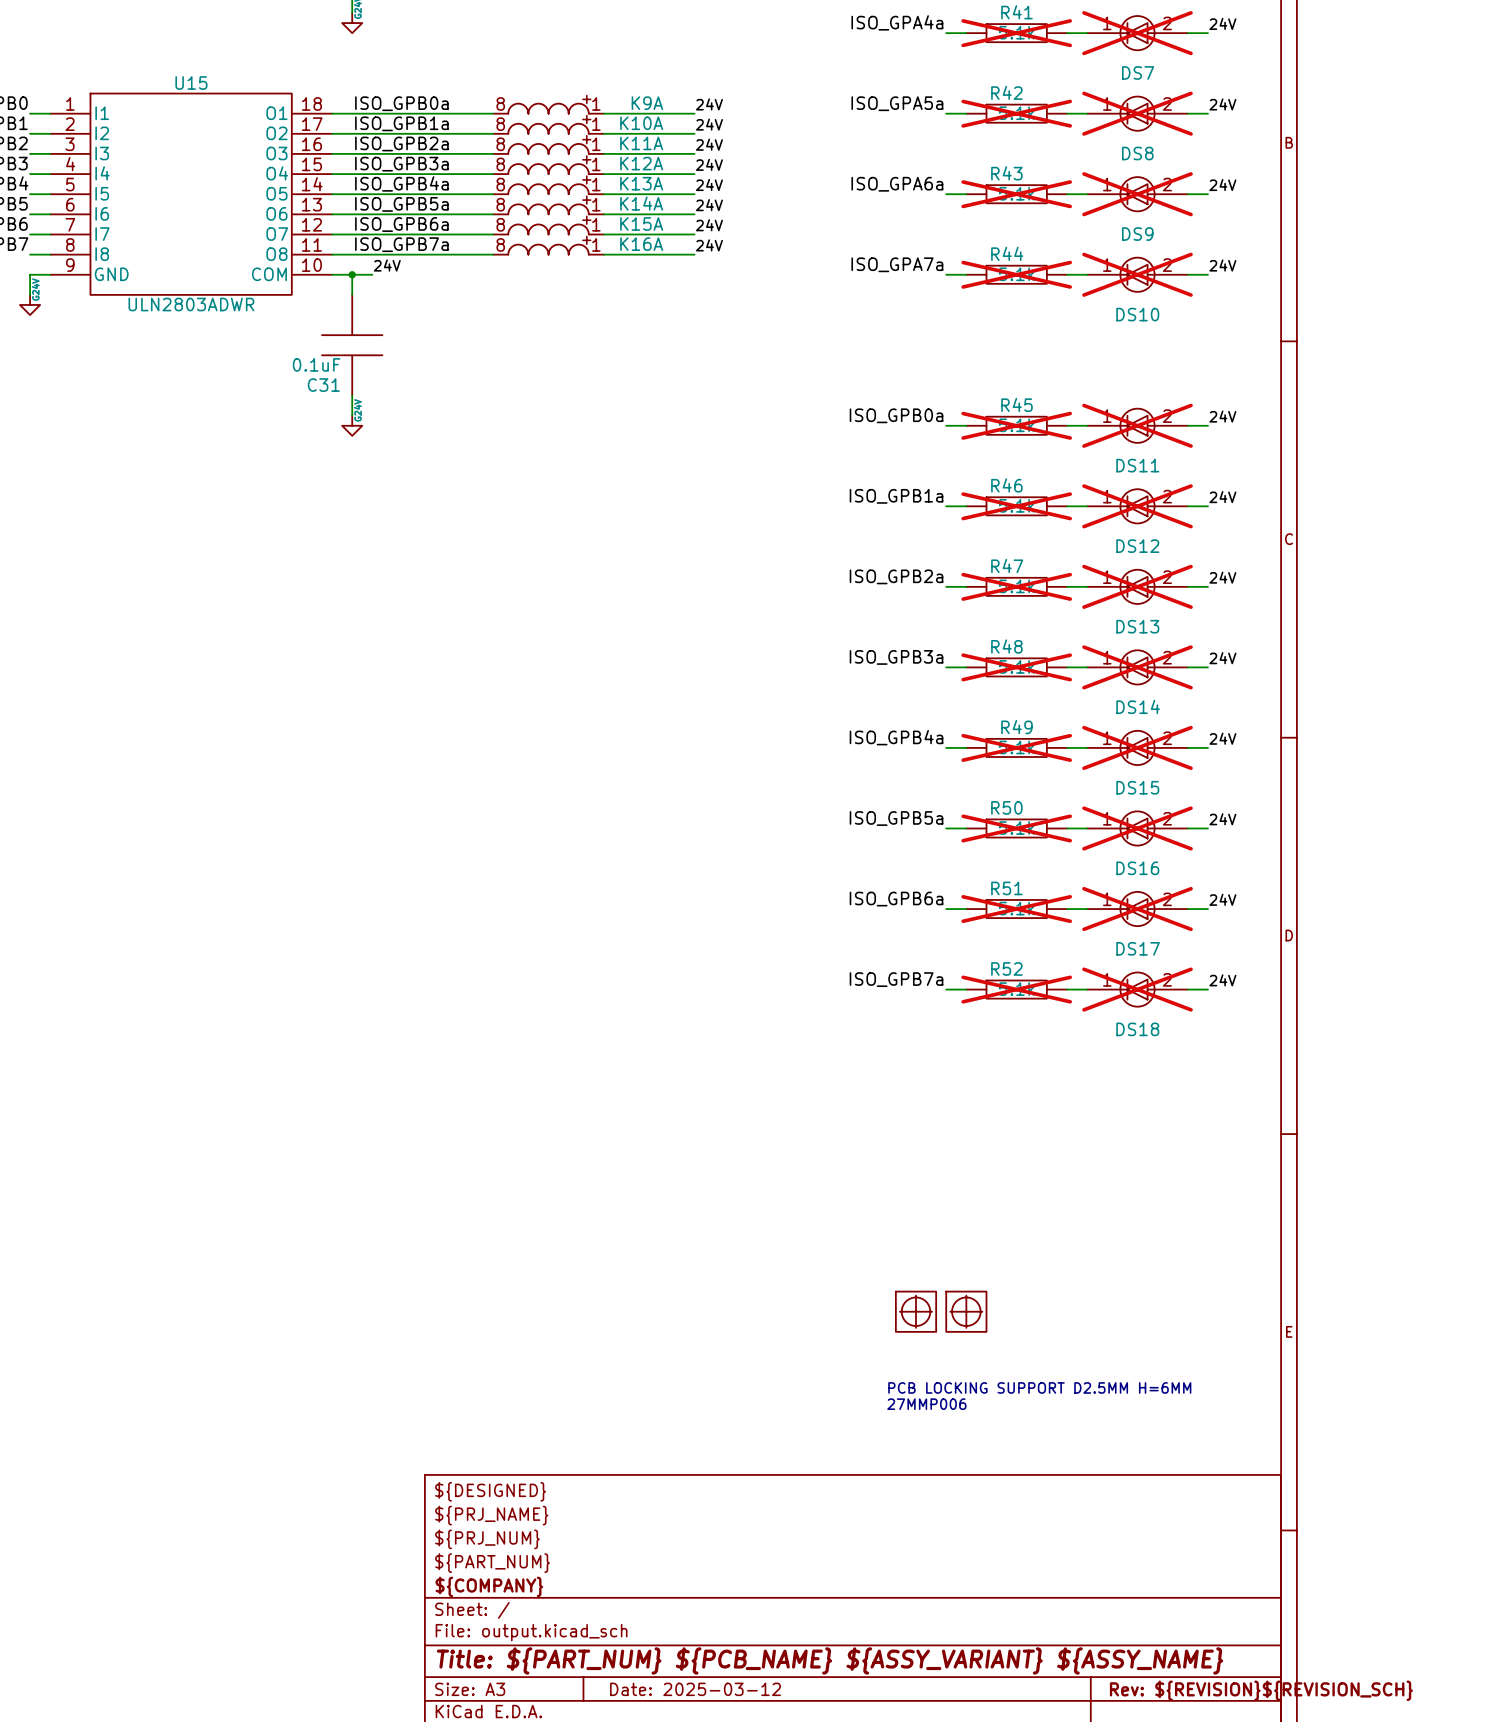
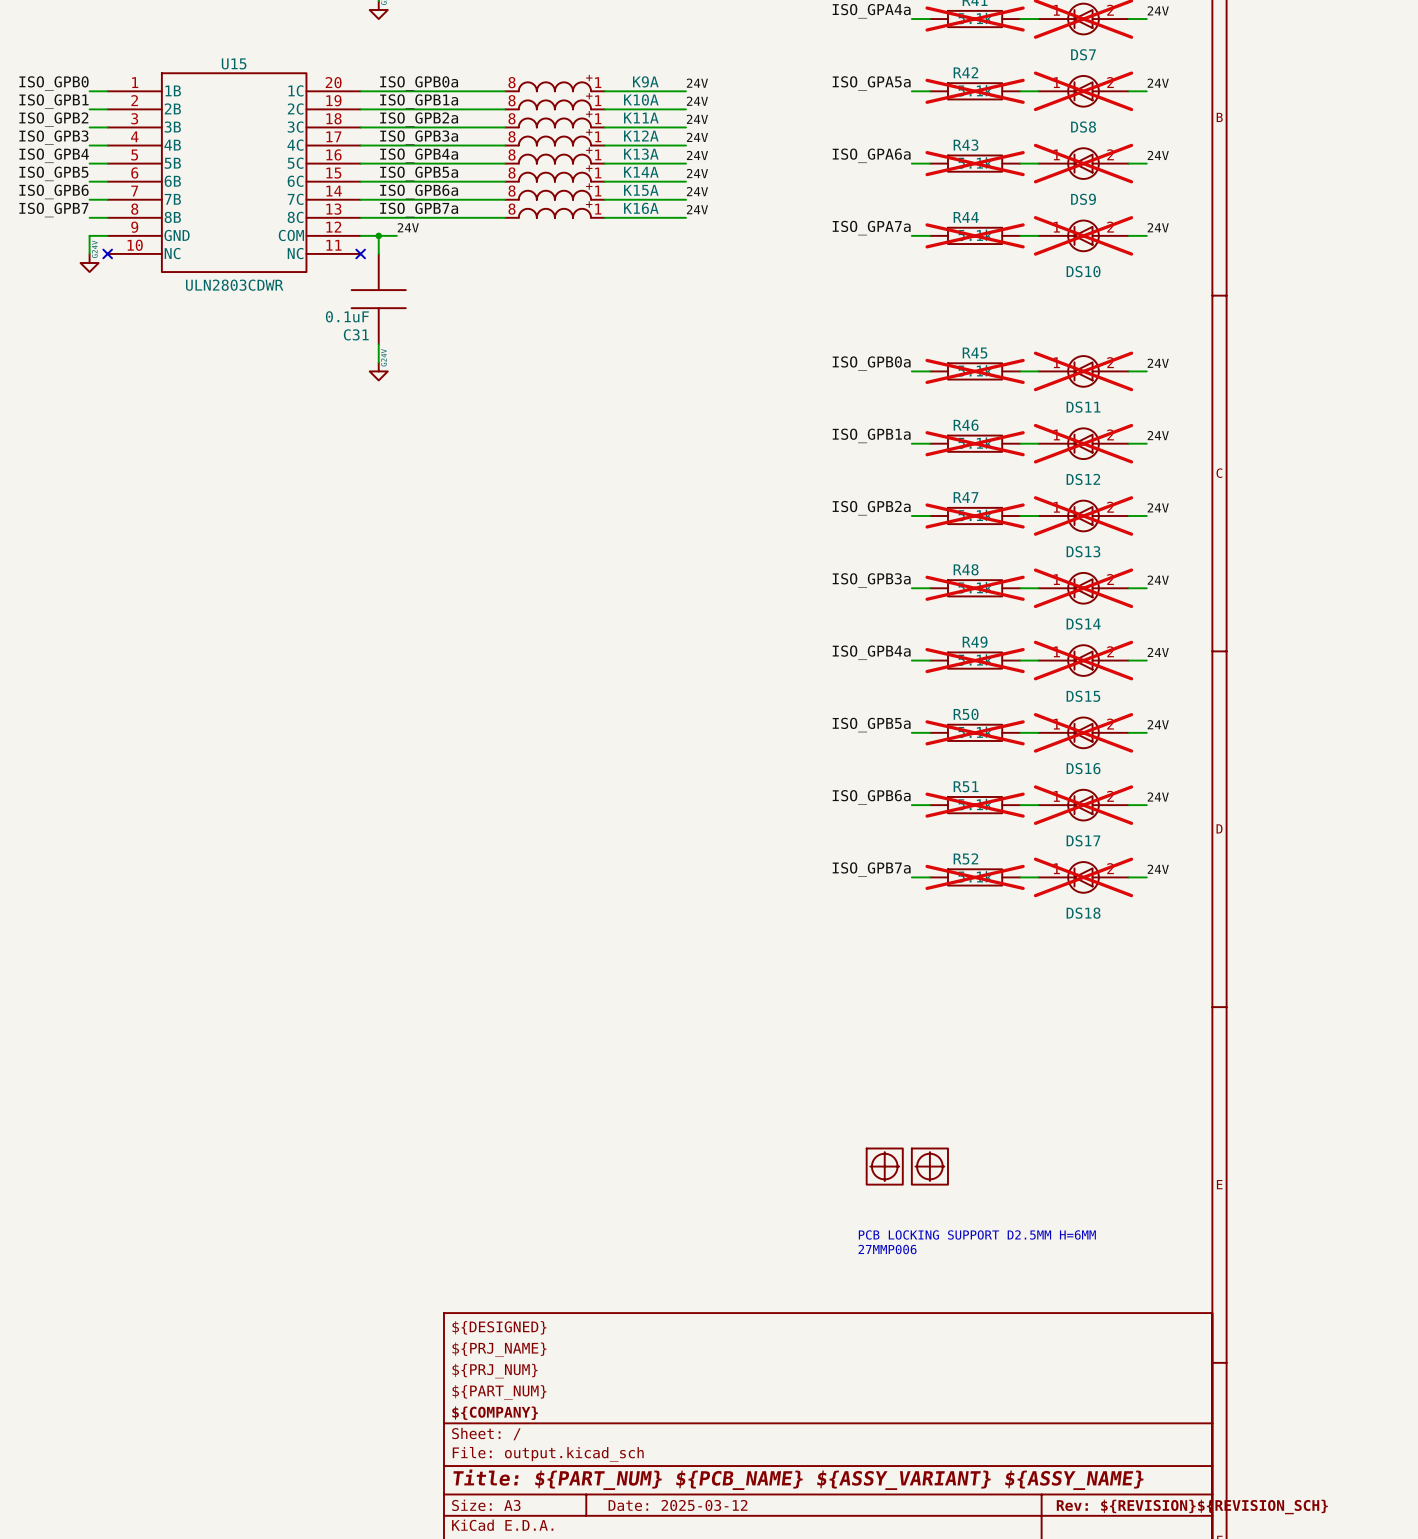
U15 symbol: [50, 93, 333, 295] -> [107, 73, 361, 273]
no-connect mark: none -> (107, 253)
no-connect mark: none -> (360, 253)
U15 text: ULN2803ADWR (191, 304) -> ULN2803CDWR (234, 285)

